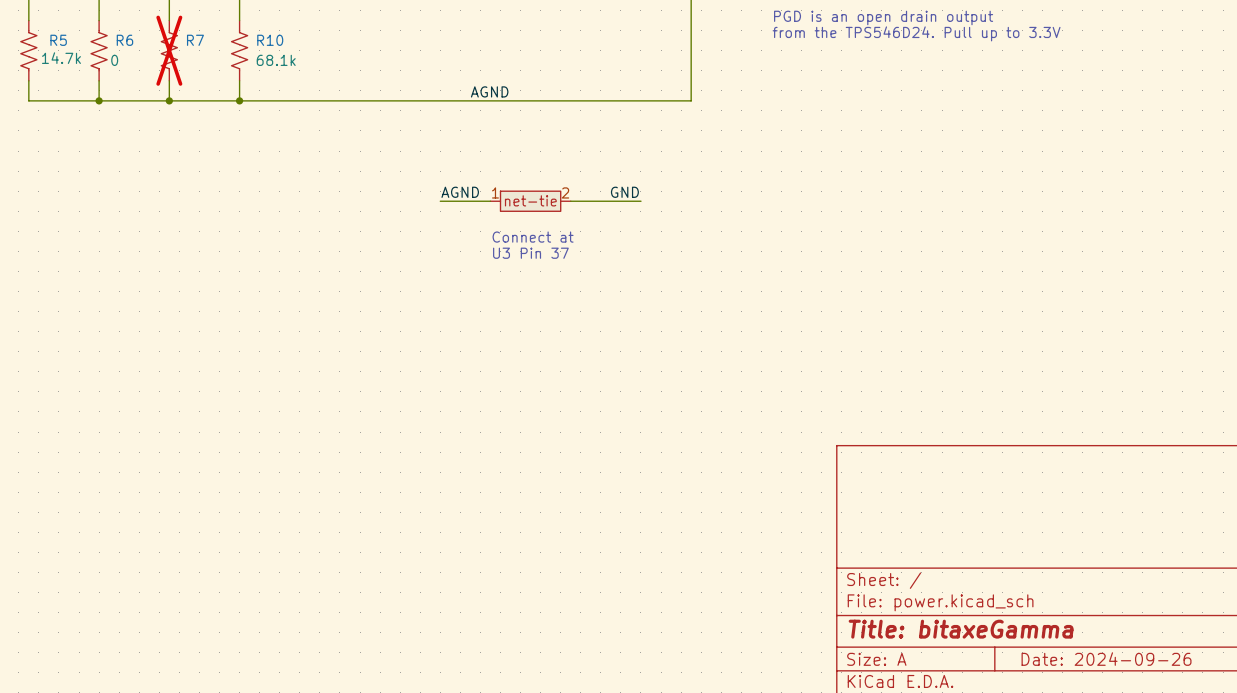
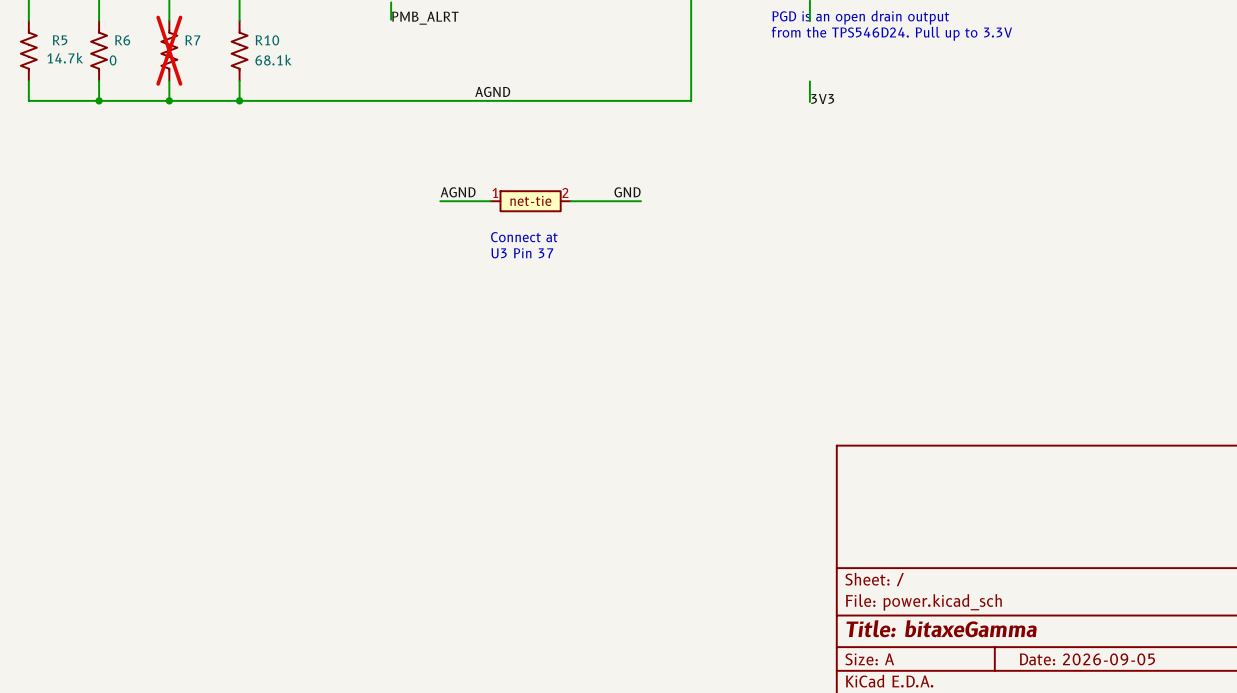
wire: none -> (809, 0) (809, 21)
wire: none -> (391, 2) (391, 19)
label: none -> PMB_ALRT (425, 18)
wire: none -> (809, 81) (809, 101)
label: none -> 3V3 (822, 98)
title block: Date: 2024-09-26 (1106, 659) -> Date: 2026-09-05 (1087, 659)

